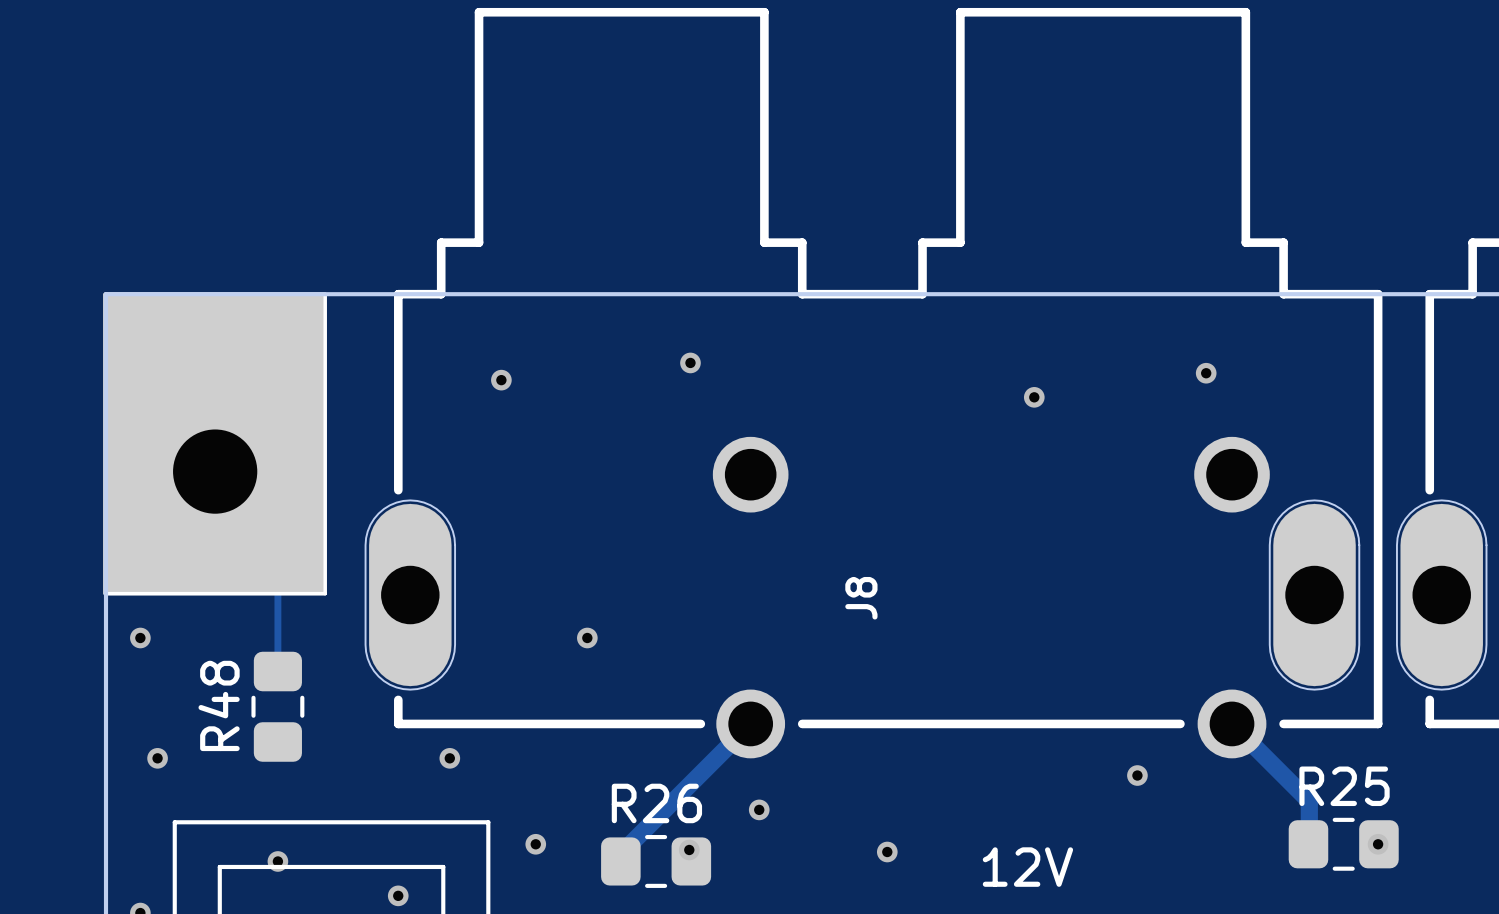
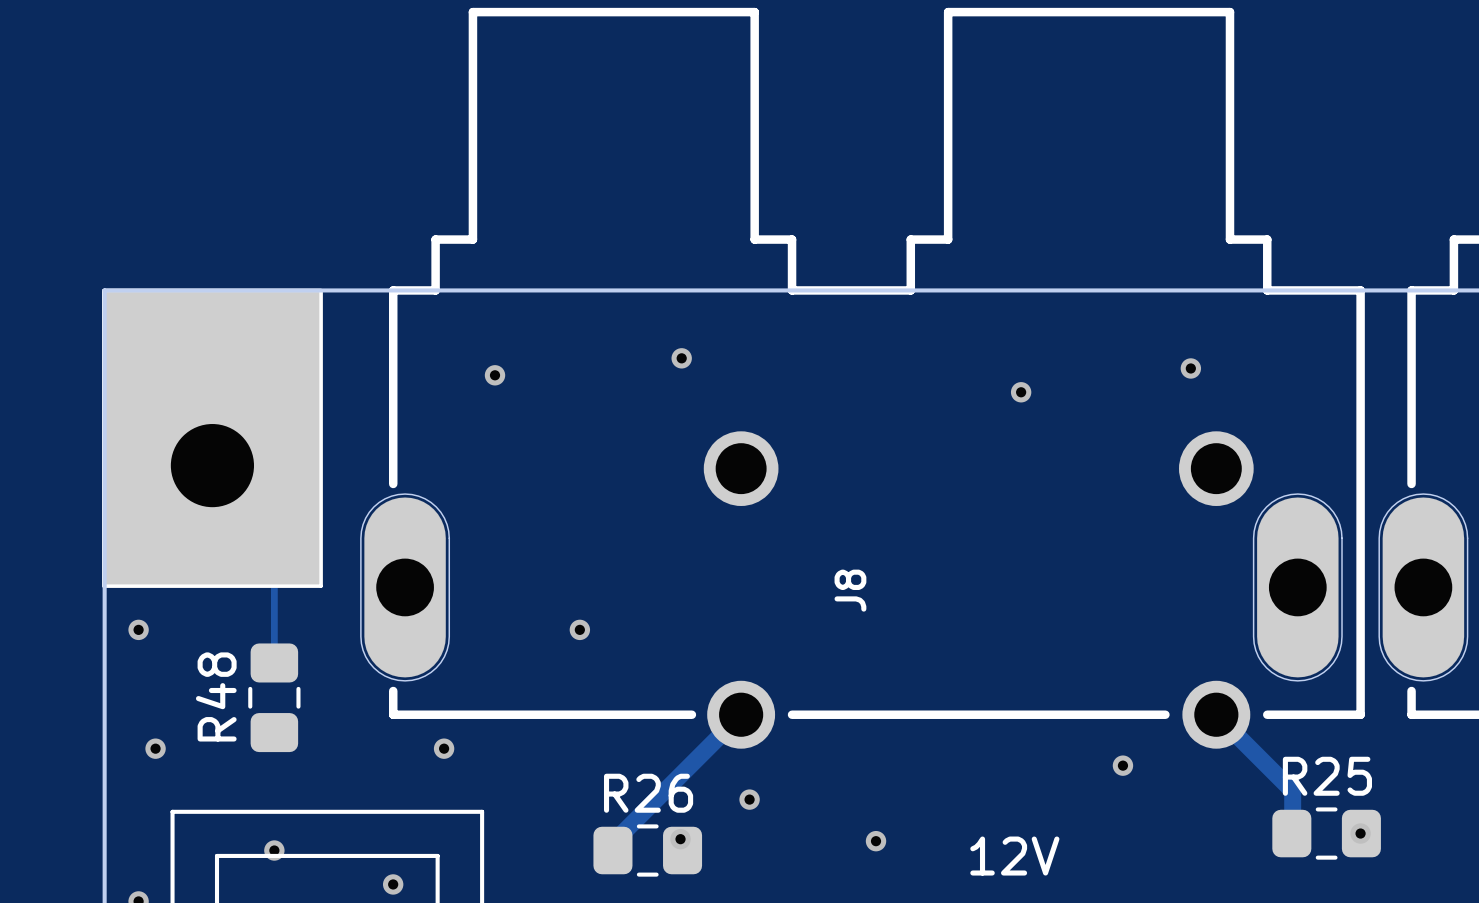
via: (535, 844) -> none

